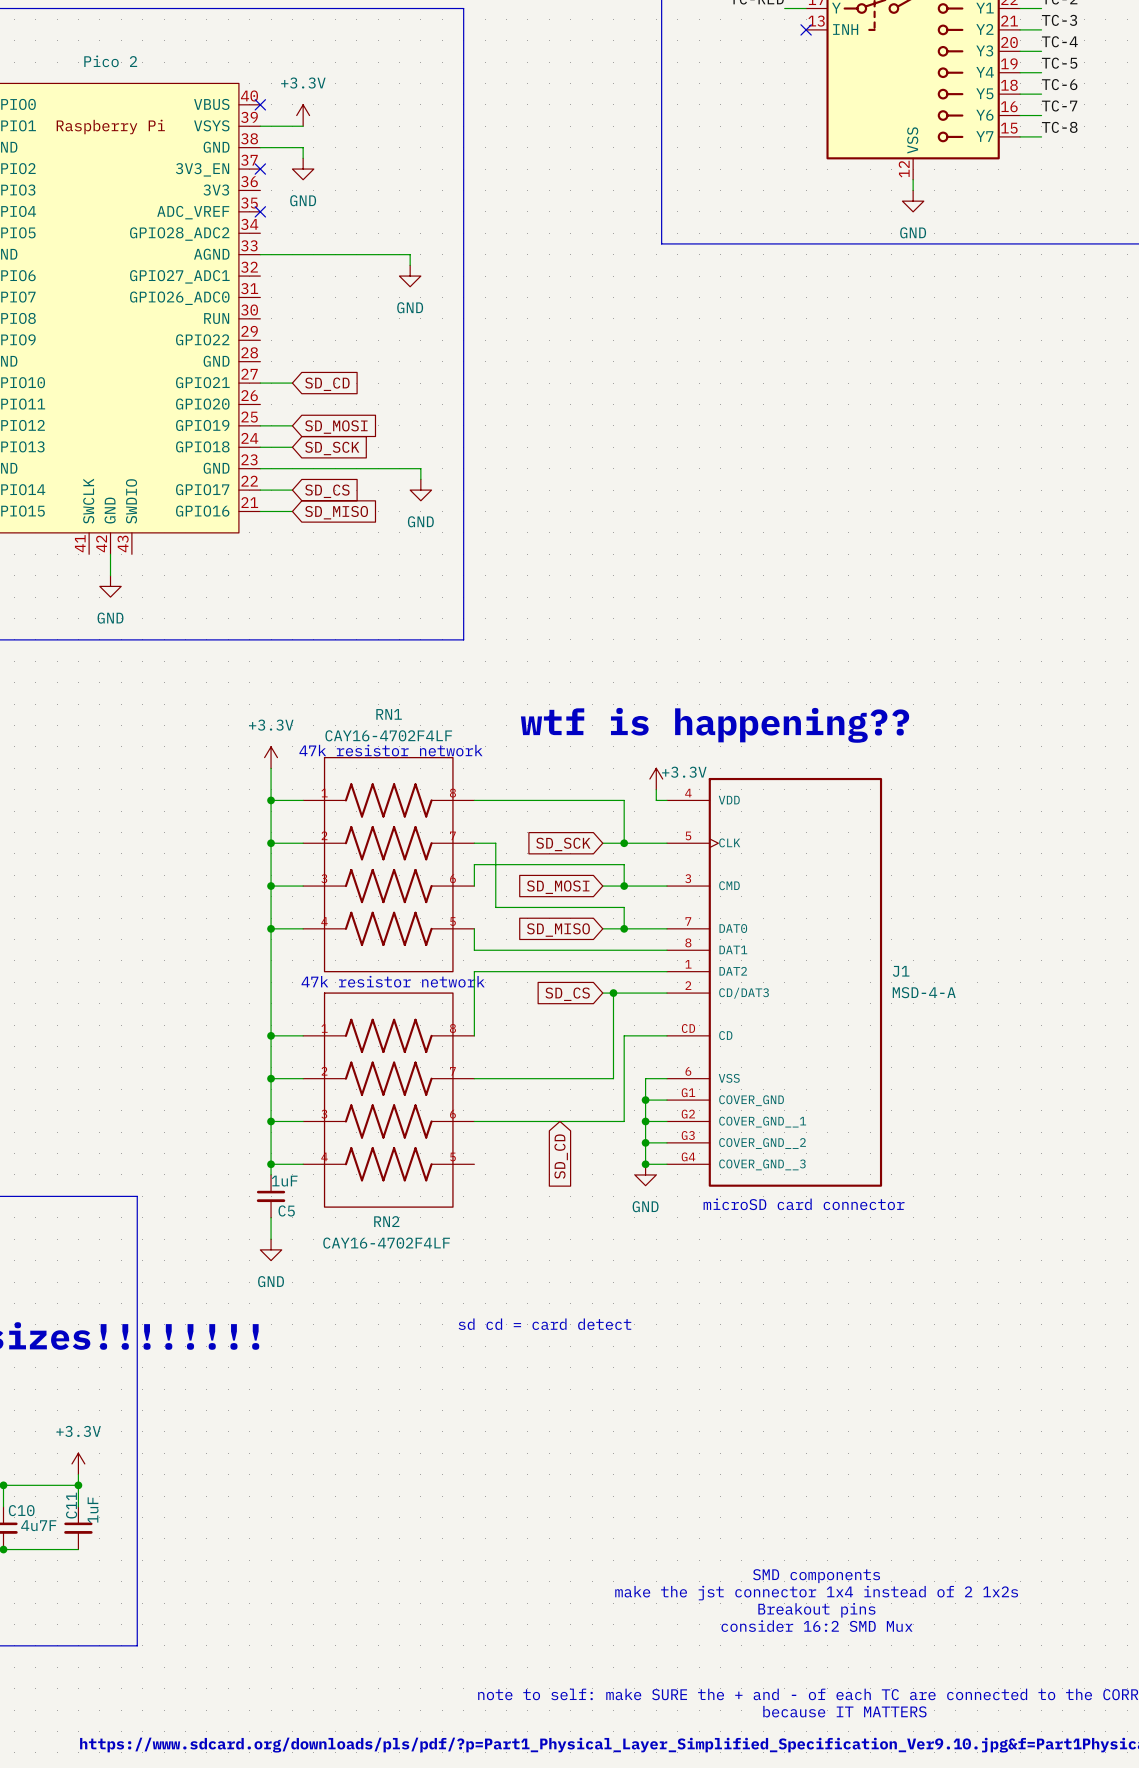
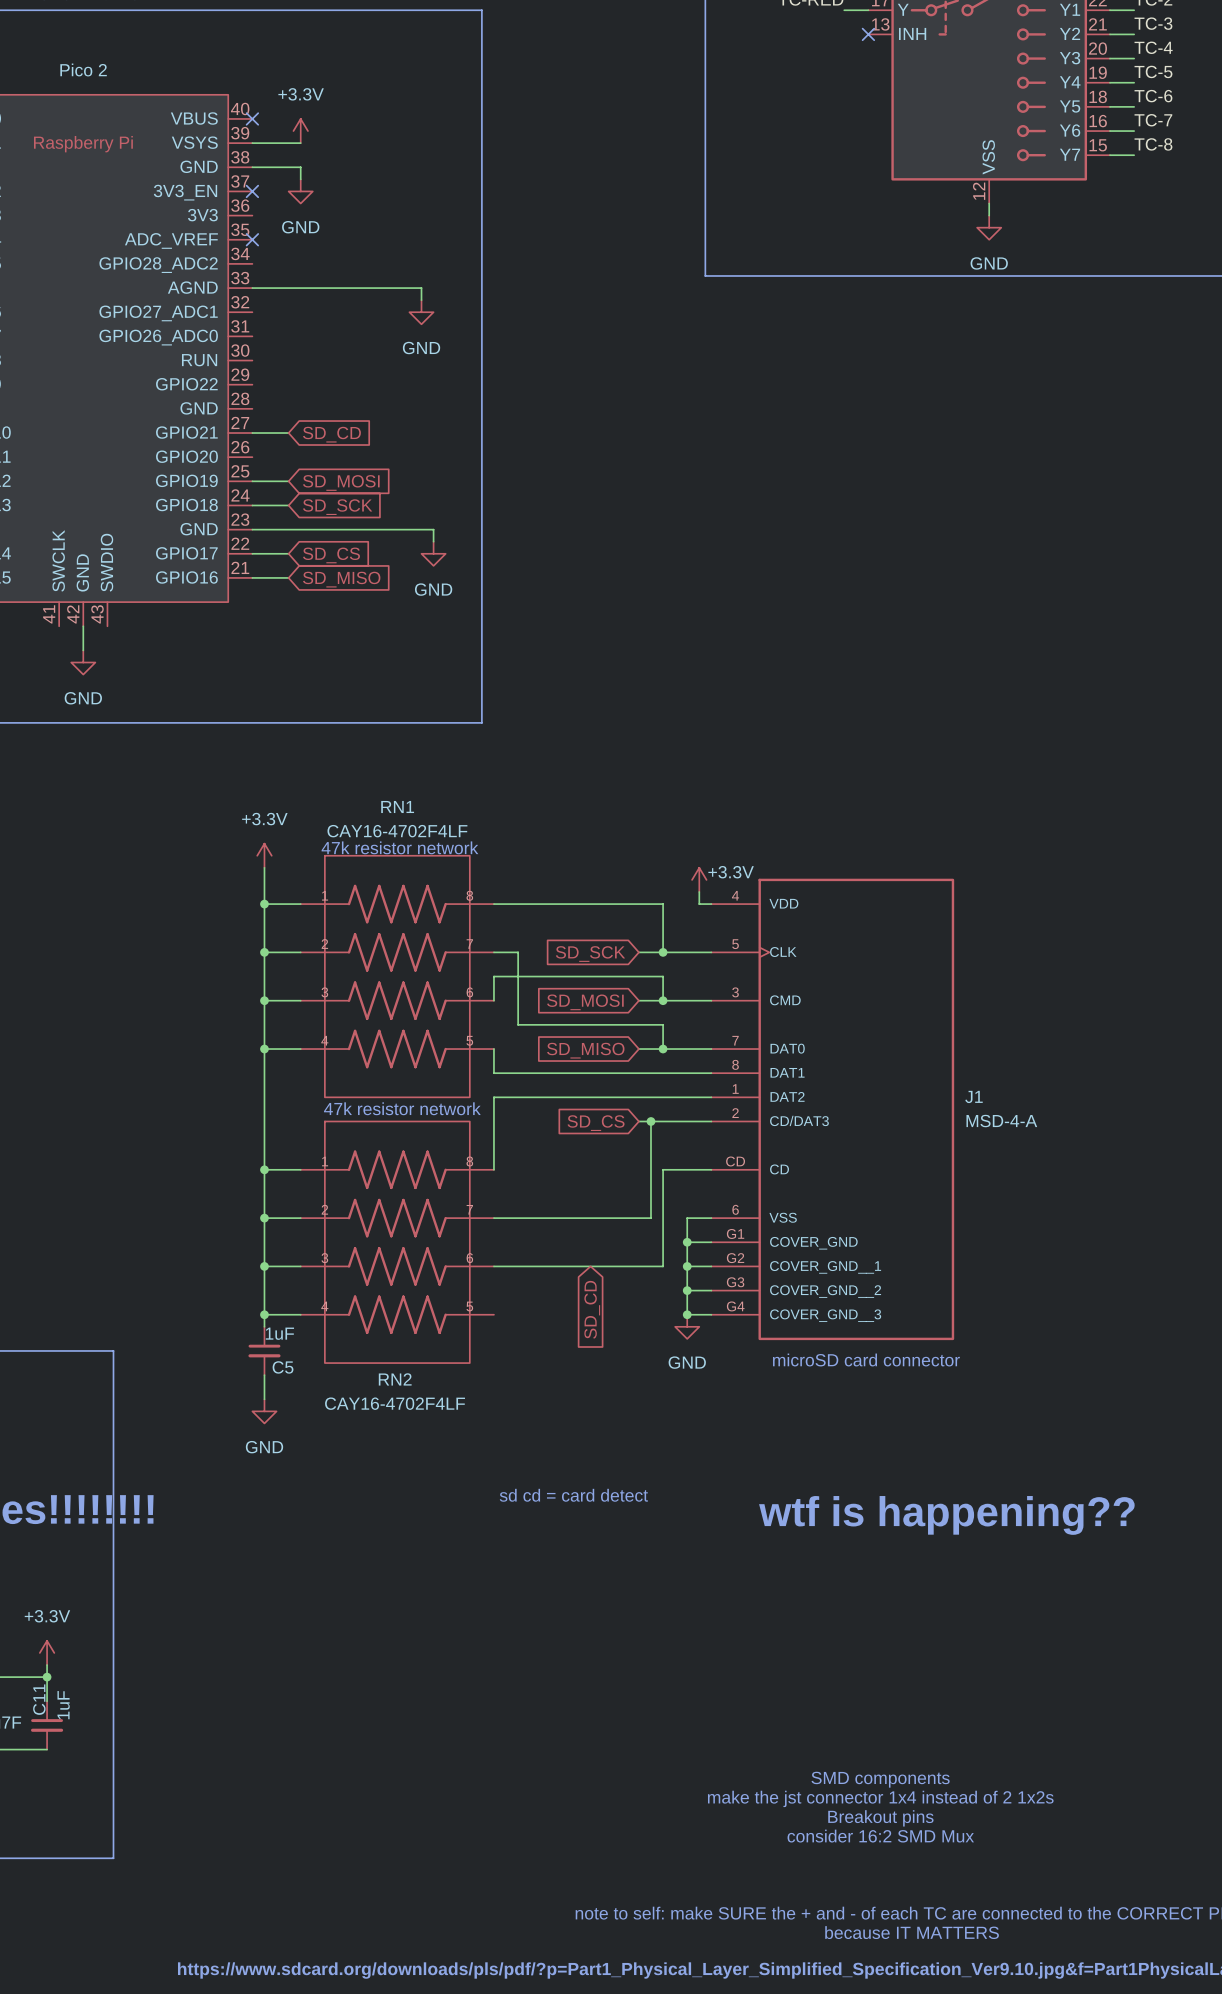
text: wtf is happening?? (715, 725) -> none
text: none -> wtf is happening?? (946, 1515)

